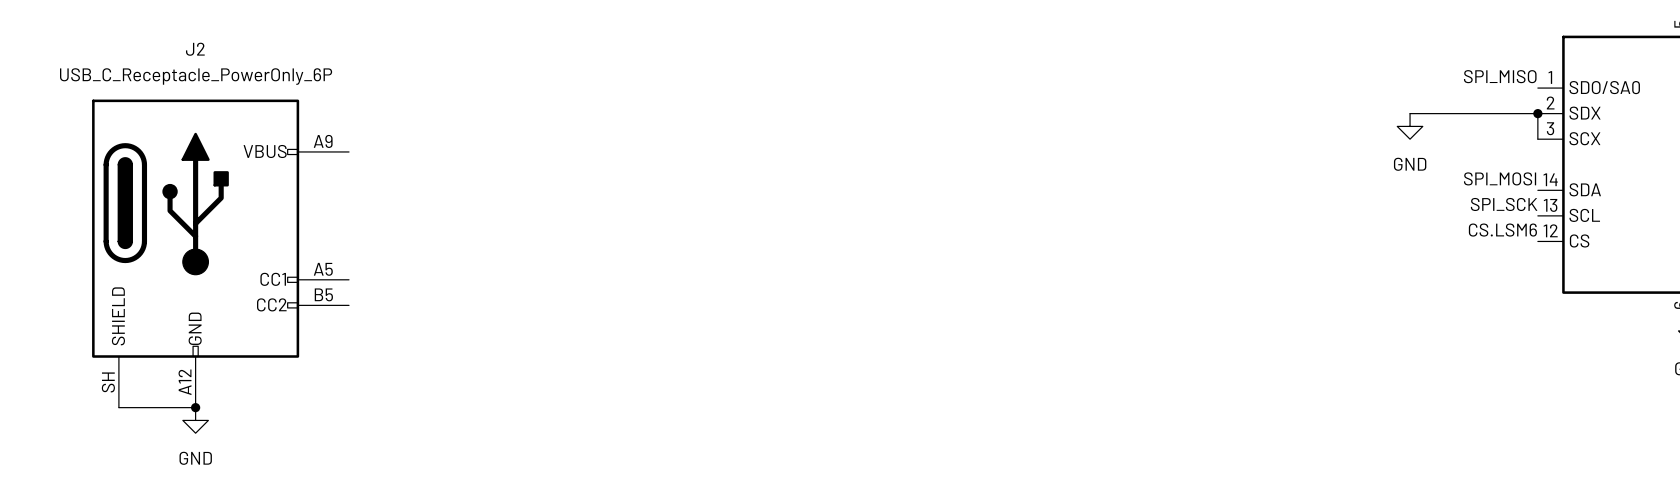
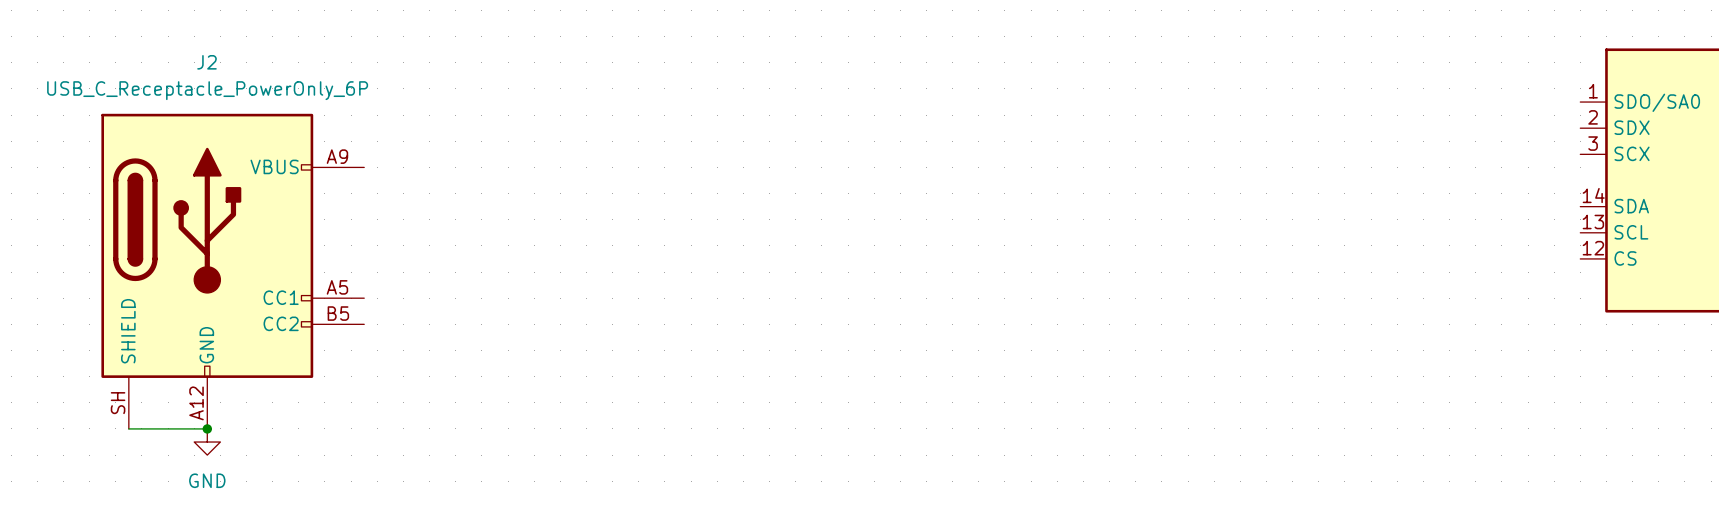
label: SPI_MISO (1500, 76) -> none
wire: (1410, 113) (1537, 113) (1537, 139) -> none
junction: (1537, 113) -> none
power symbol: GND (1410, 126) -> none
label: SPI_MOSI (1500, 178) -> none
label: SPI_SCK (1504, 204) -> none
label: CS.LSM6 (1502, 230) -> none

